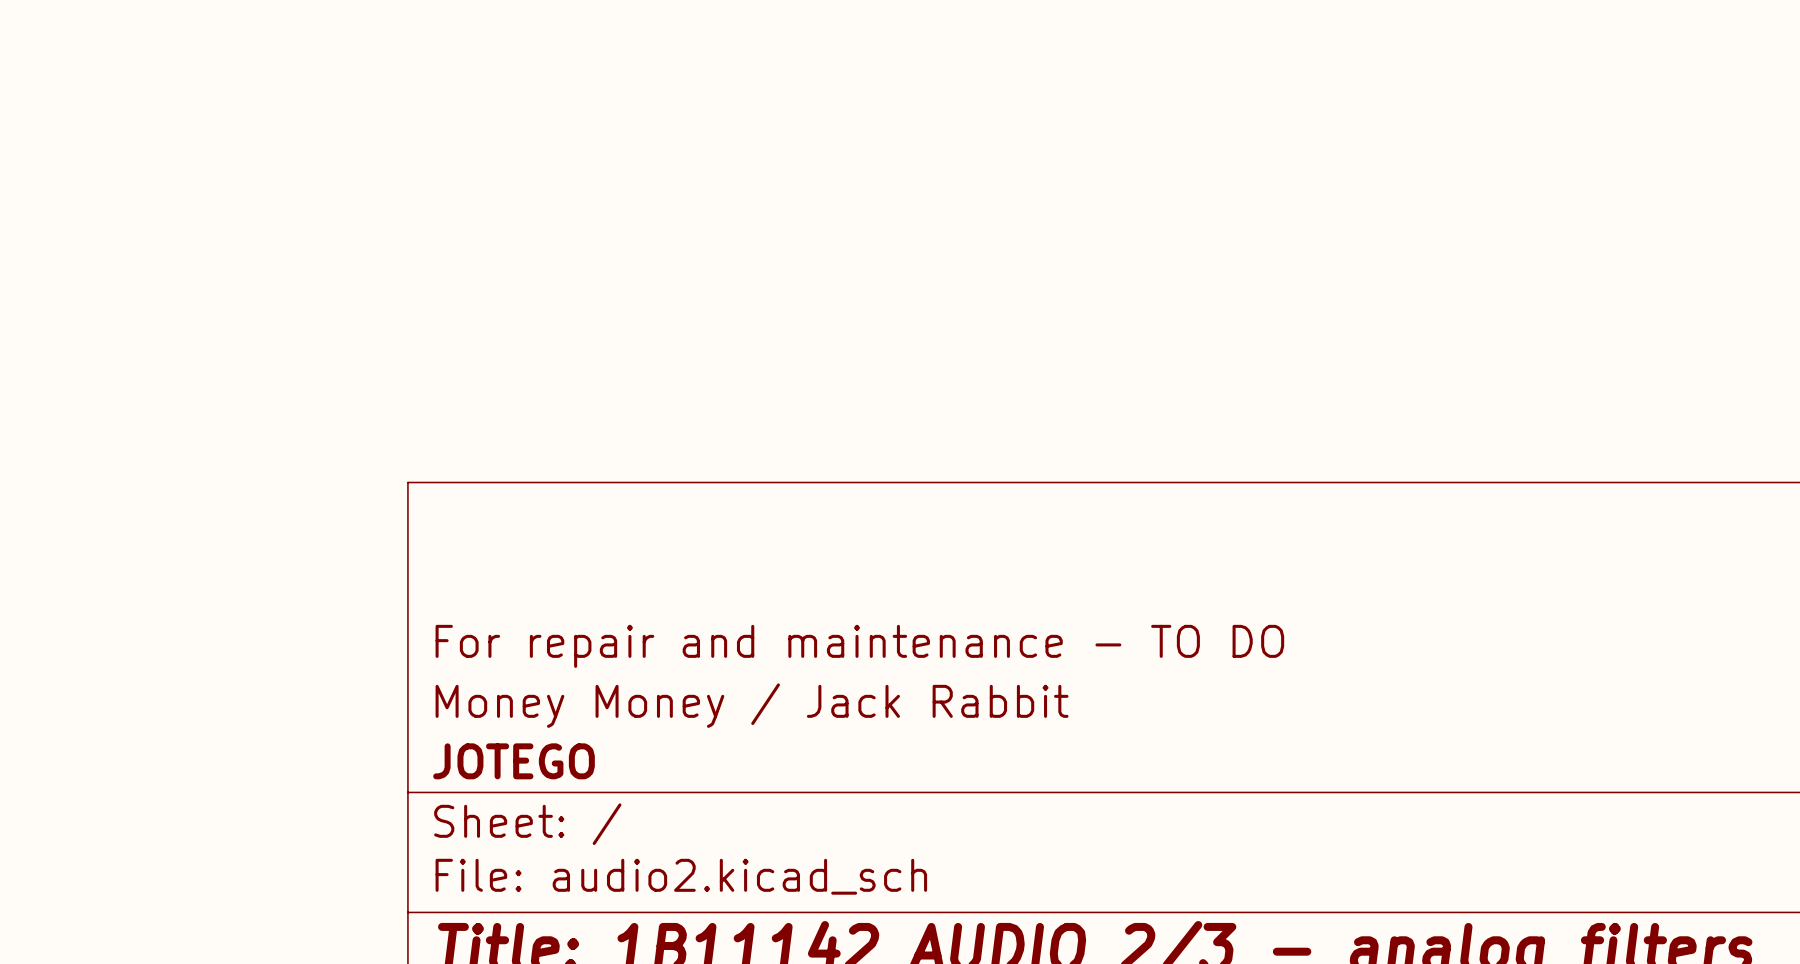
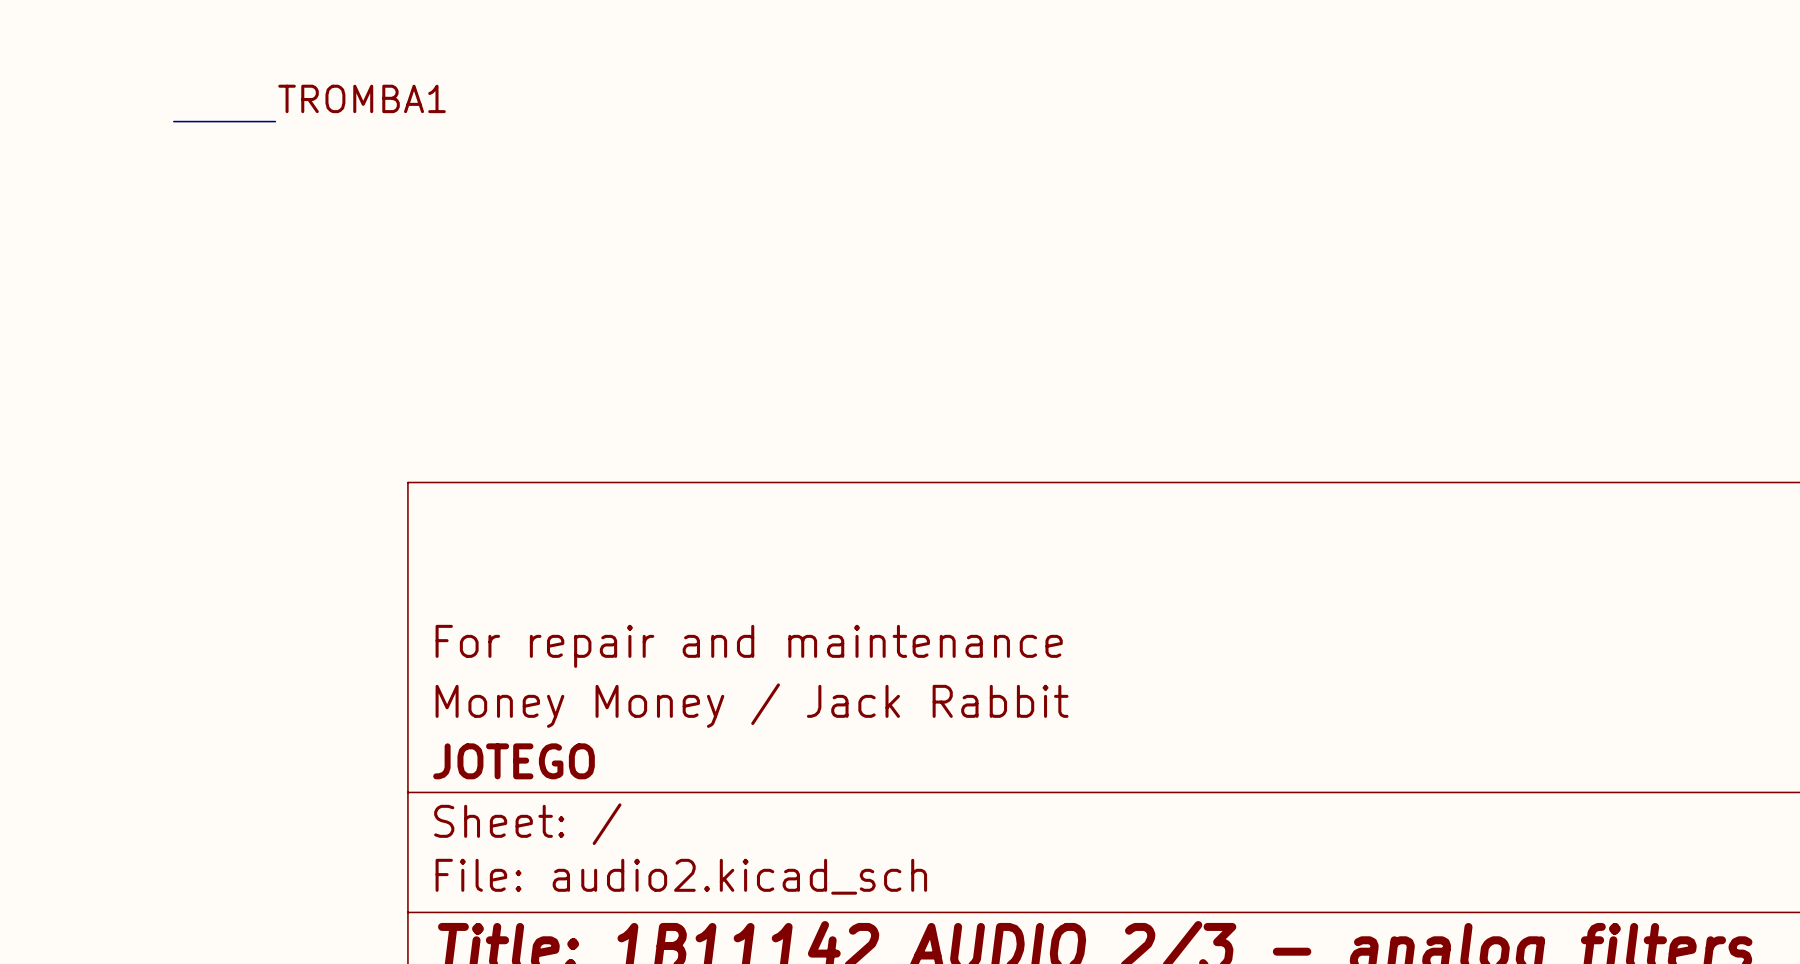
label: none -> TROMBA1 (362, 98)
wire: none -> (173, 121) (275, 121)
title block: For repair and maintenance - TO DO (859, 646) -> For repair and maintenance (749, 646)

